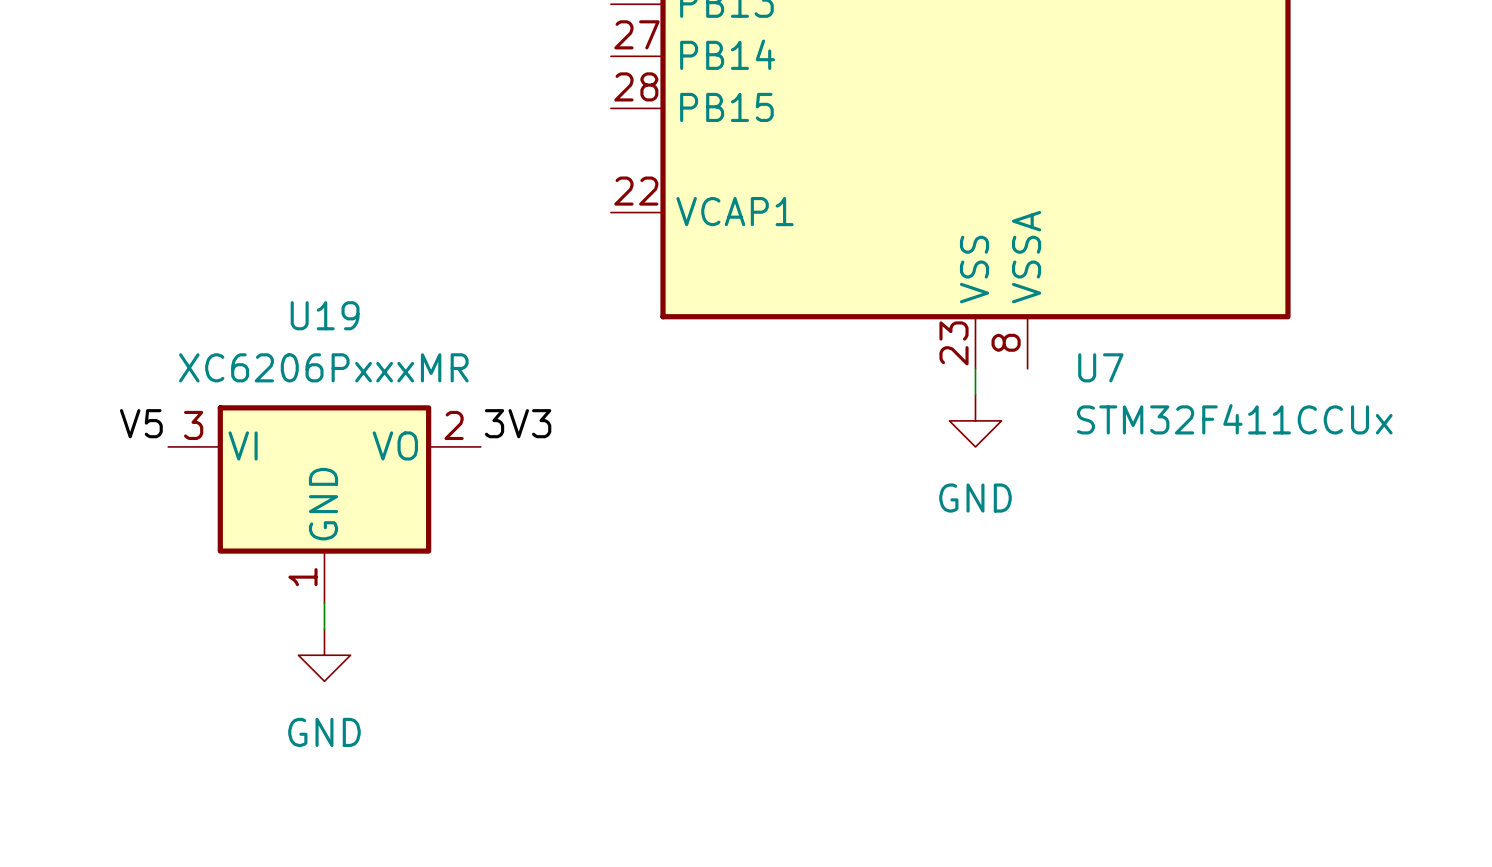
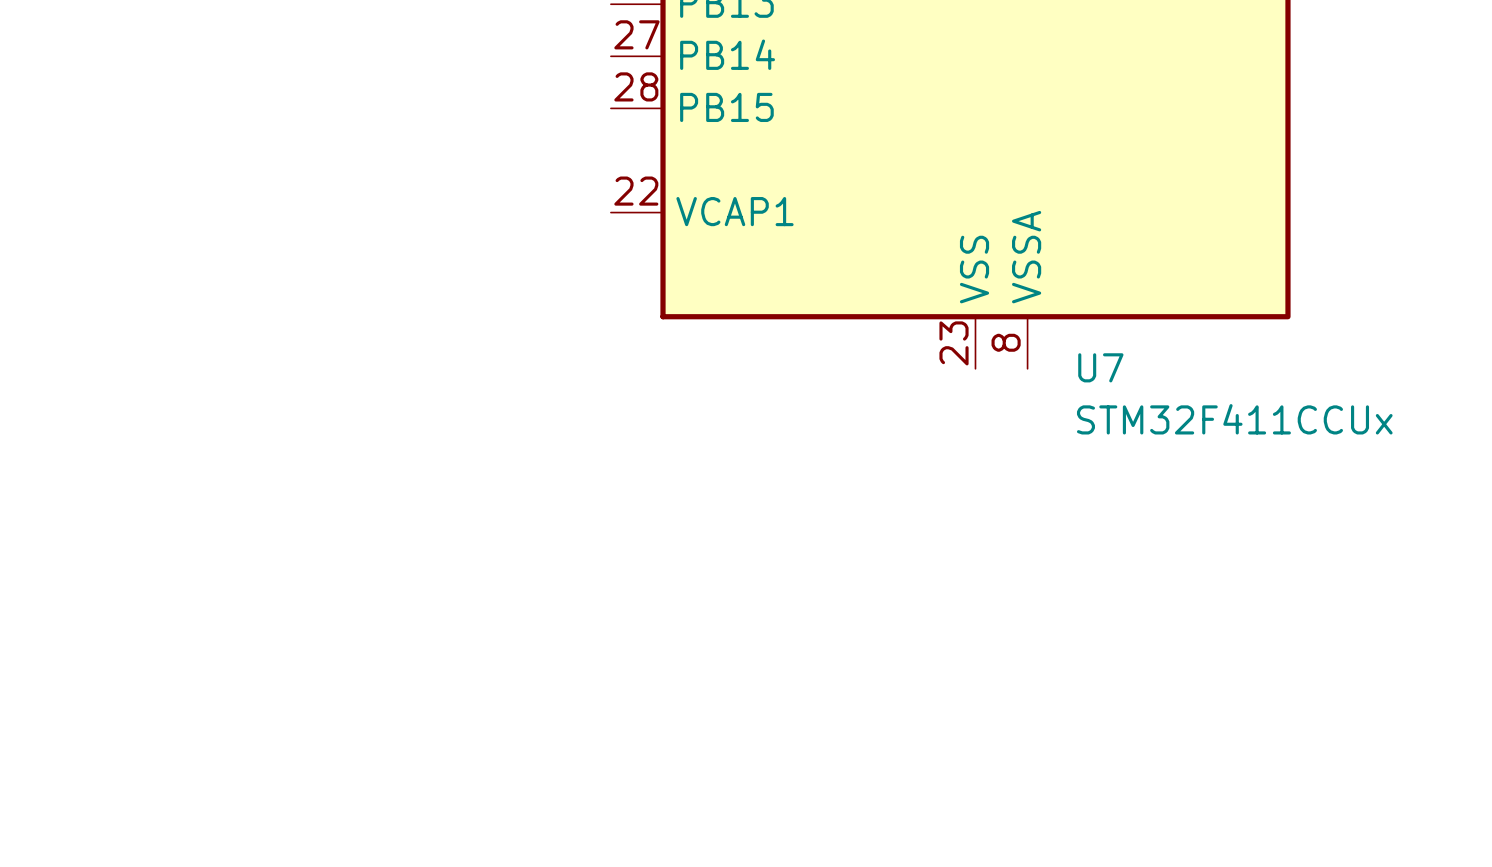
wire: (975, 368) (975, 394) -> none
power symbol: GND (975, 420) -> none
label: V5 (141, 423) -> none
label: 3V3 (518, 423) -> none
U19: XC6206PxxxMR (324, 504) -> none
wire: (324, 603) (324, 629) -> none
power symbol: GND (324, 655) -> none

